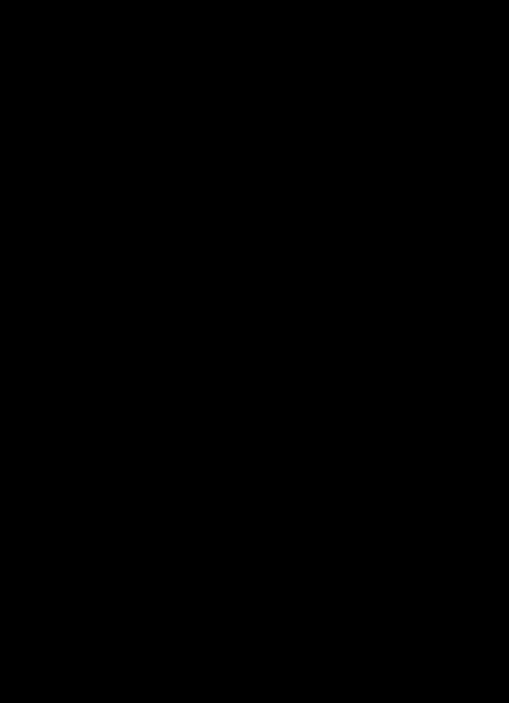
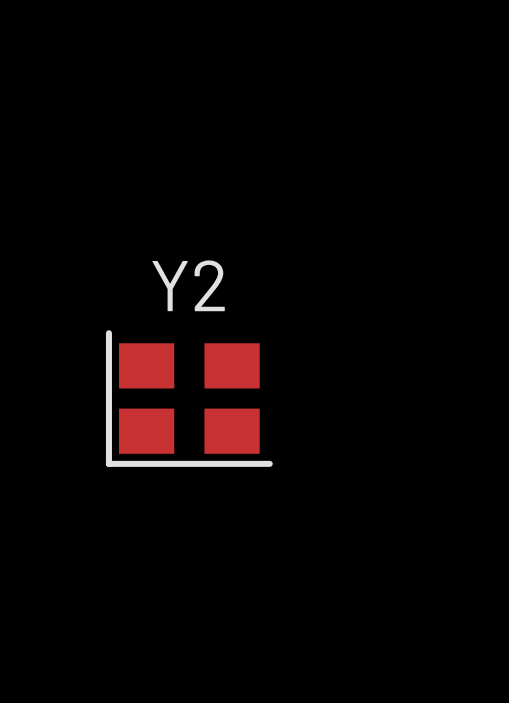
Y2: none -> (189, 398)

